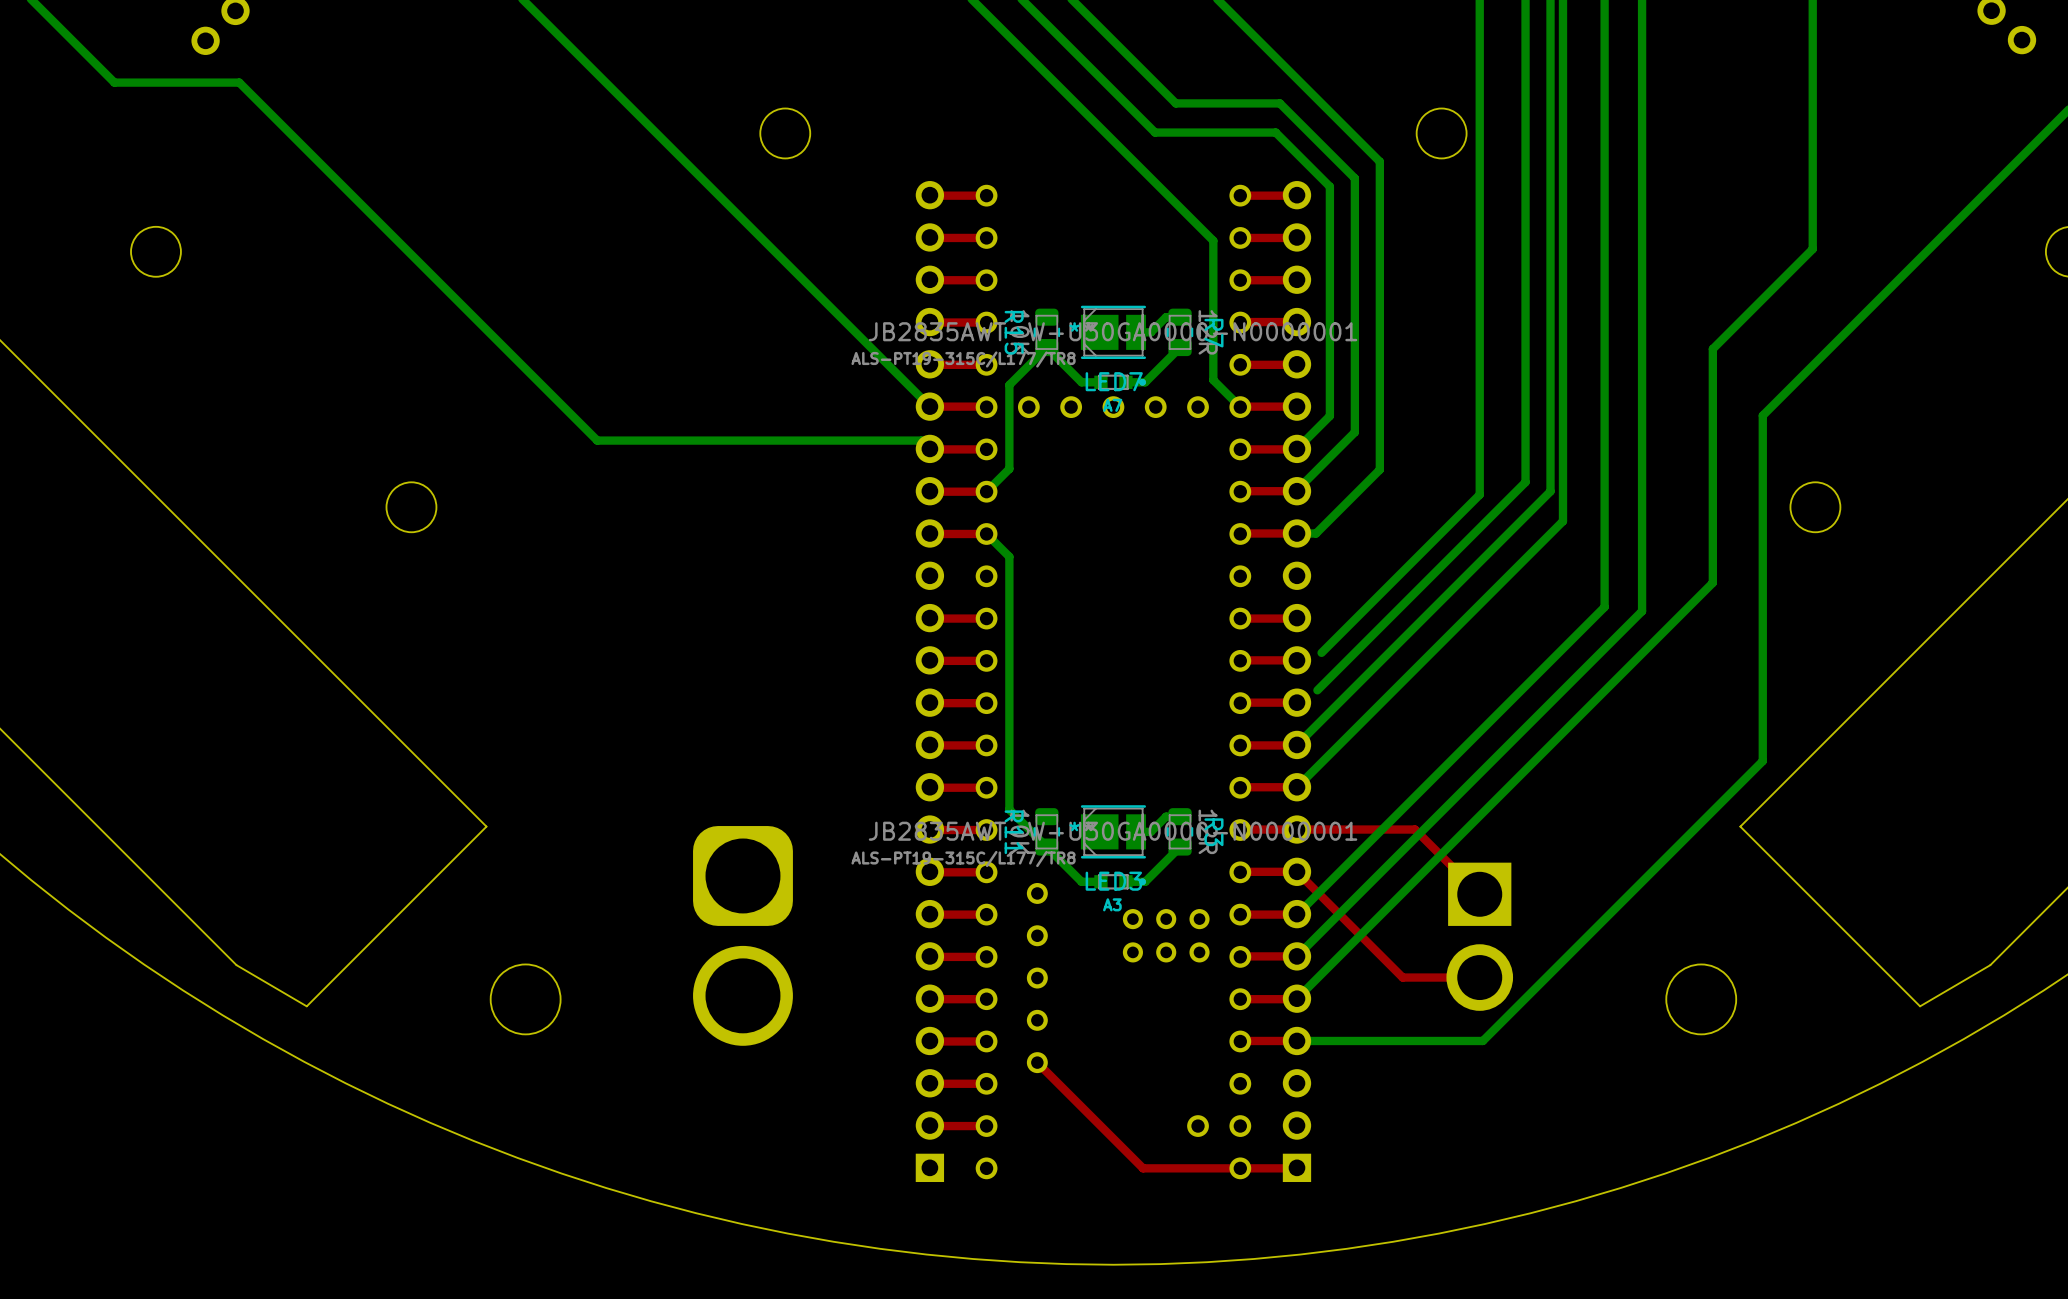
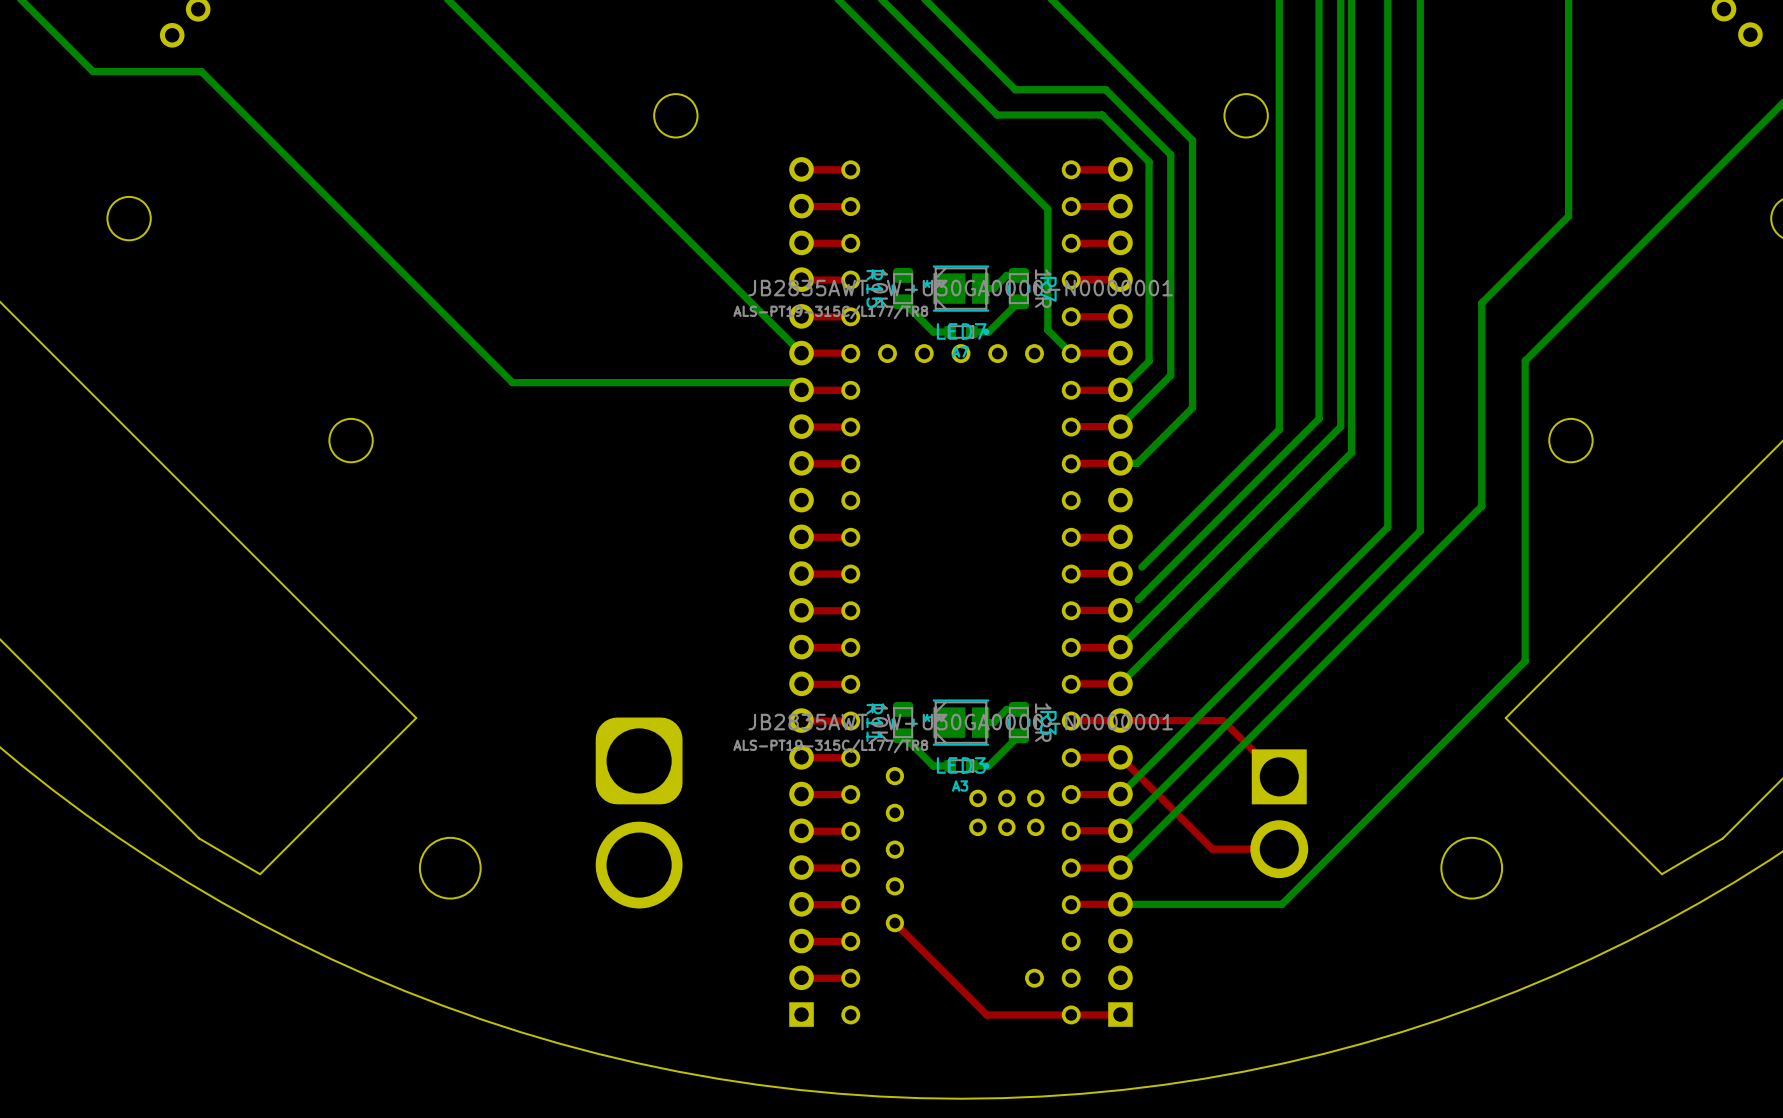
bottom track: (1046, 347) (1009, 385) (1009, 468) (986, 491) -> none
bottom track: (986, 533) (1009, 556) (1009, 809) (1046, 847) -> none

